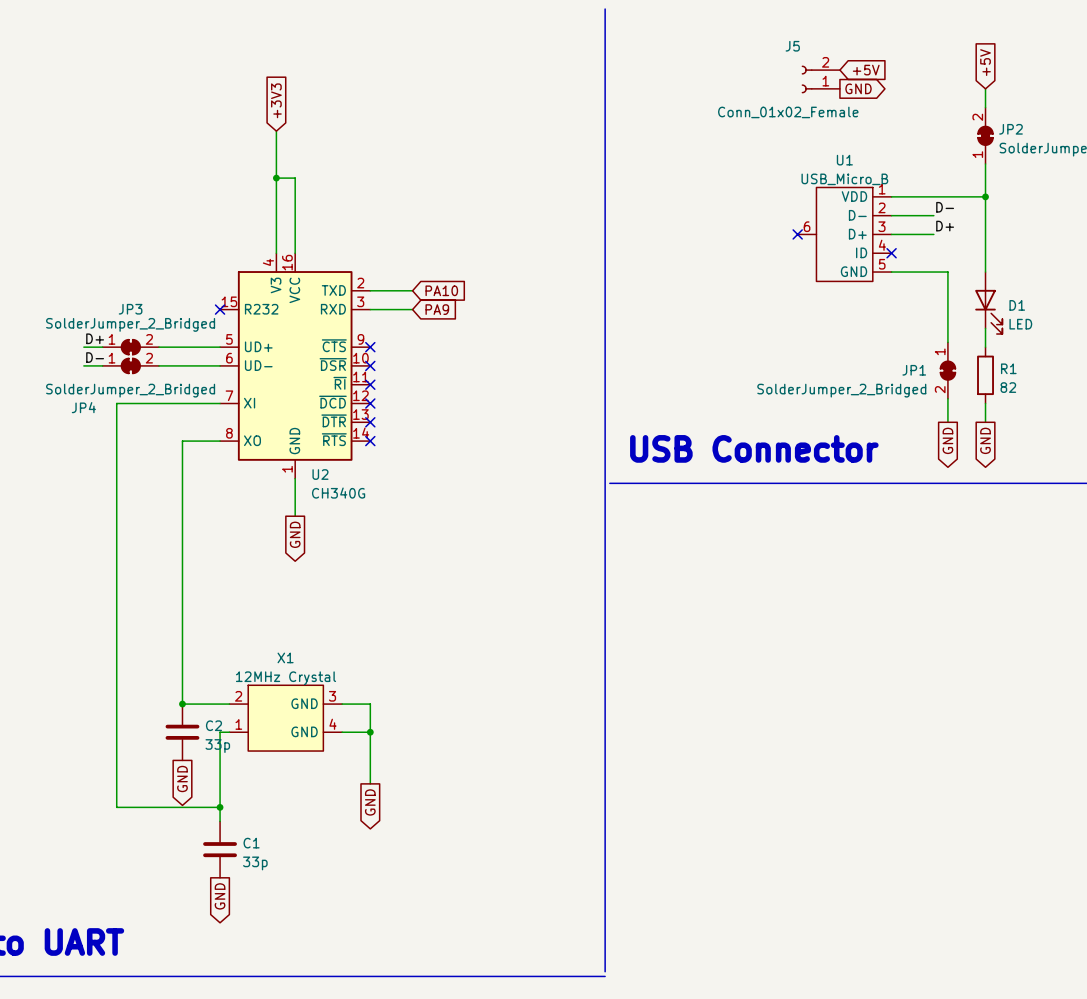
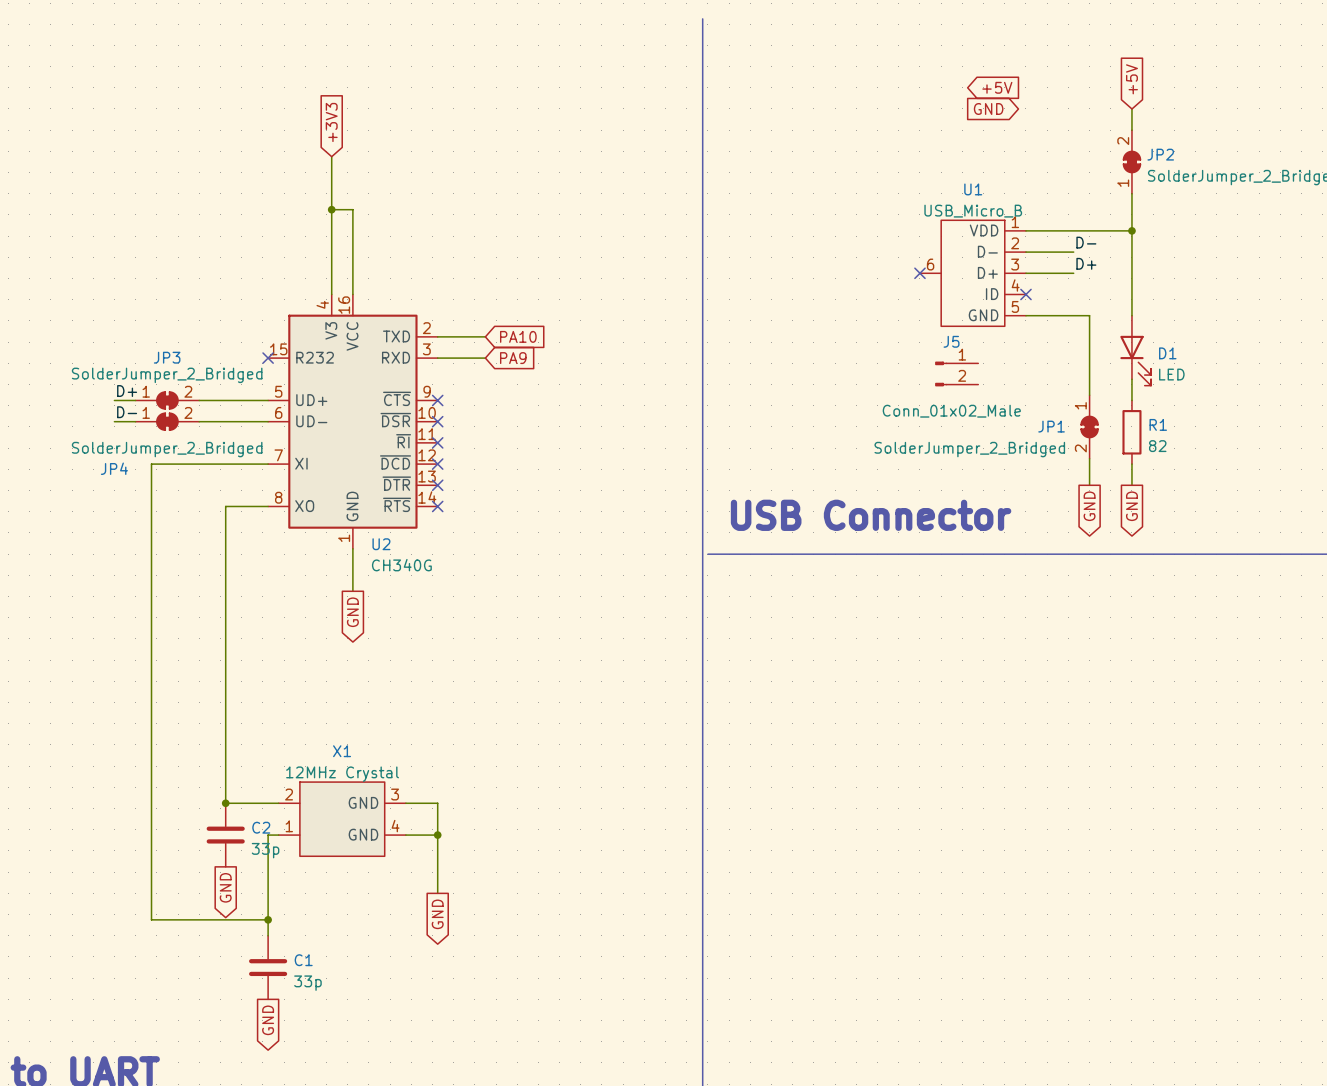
J5 name position: J5 (792, 46) -> J5 (951, 341)
J5 symbol: [801, 65, 840, 94] -> [935, 361, 979, 387]
J5 value: Conn_01x02_Female (788, 112) -> Conn_01x02_Male (951, 411)

